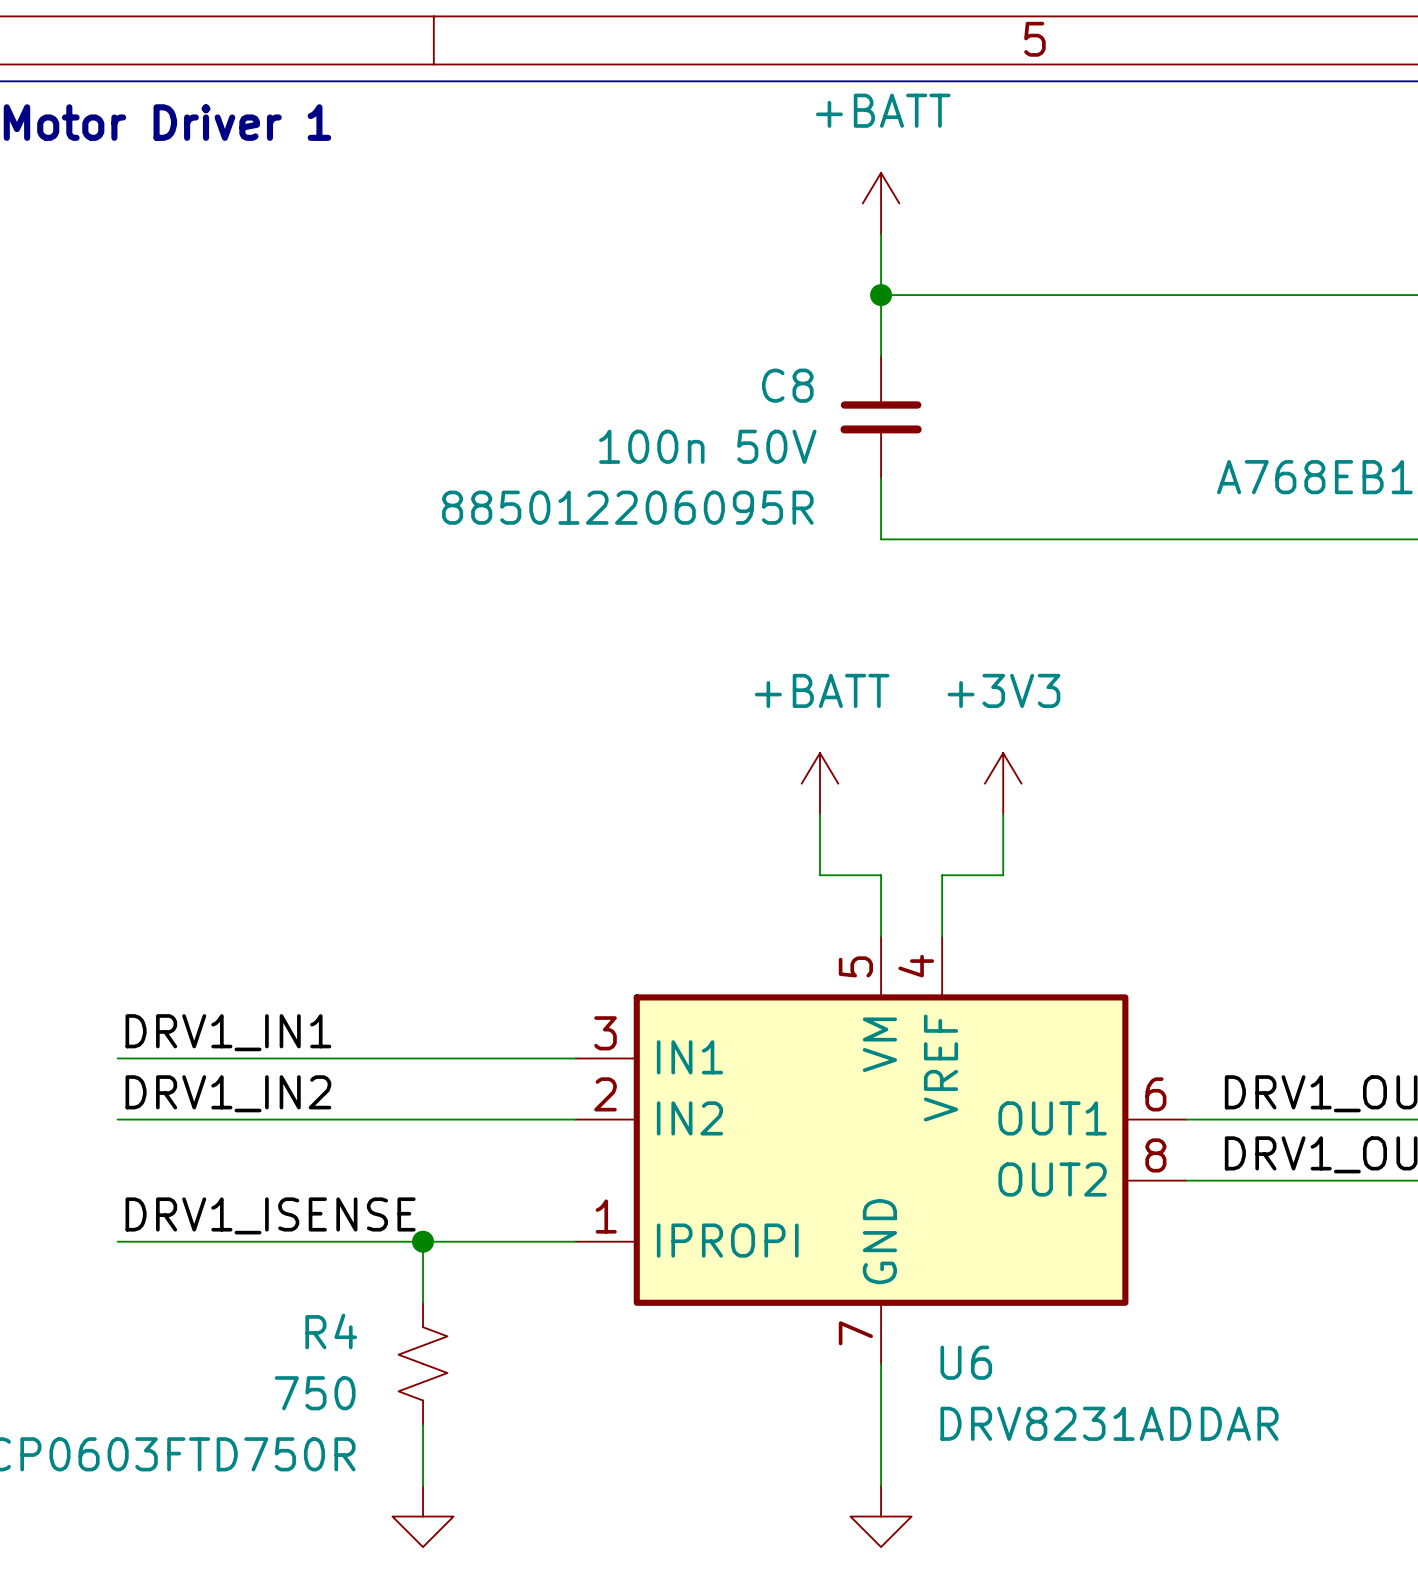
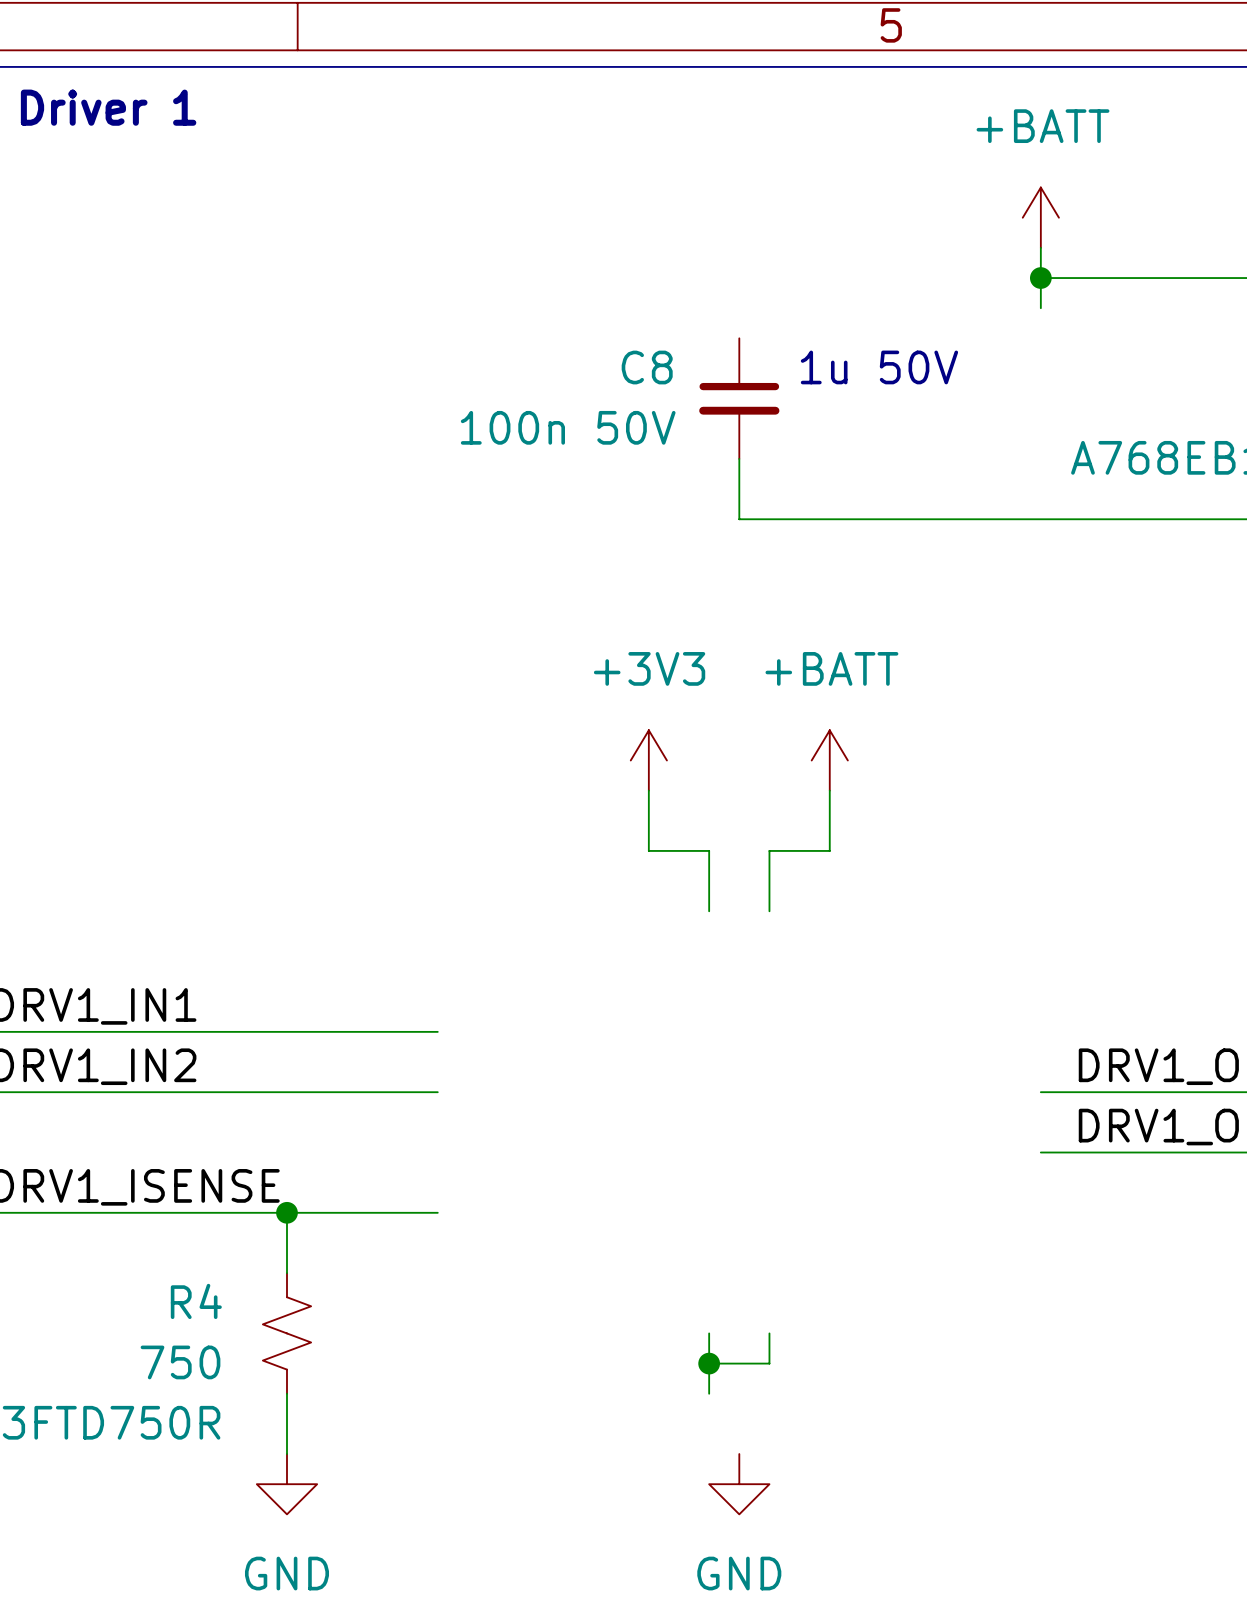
power symbol: +BATT (881, 203) -> none
wire: (881, 234) (881, 356) -> none
power symbol: none -> +BATT (1040, 217)
wire: none -> (1040, 247) (1040, 308)
wire: (881, 295) (1186, 295) -> none
junction: (881, 295) -> none
junction: none -> (1040, 278)
text: none -> 1u 50V (879, 367)
C8 text: 885012206095R (627, 507) -> none
power symbol position: +BATT (819, 783) -> +BATT (829, 760)
power symbol position: +3V3 (1003, 783) -> +3V3 (648, 760)
wire: (819, 814) (819, 875) -> (648, 790) (648, 850) (679, 850)
wire: (1003, 814) (1003, 875) (972, 875) -> (829, 790) (829, 850)
wire: (850, 875) (881, 875) (881, 936) -> (709, 850) (709, 911)
wire: (942, 875) (942, 936) -> (799, 850) (769, 850) (769, 911)
U6: DRV8231ADDAR (881, 1150) -> none
wire: none -> (709, 1333) (709, 1393)
wire: (881, 1363) (881, 1486) -> none
wire: none -> (769, 1333) (769, 1363) (709, 1363)
junction: none -> (709, 1363)

